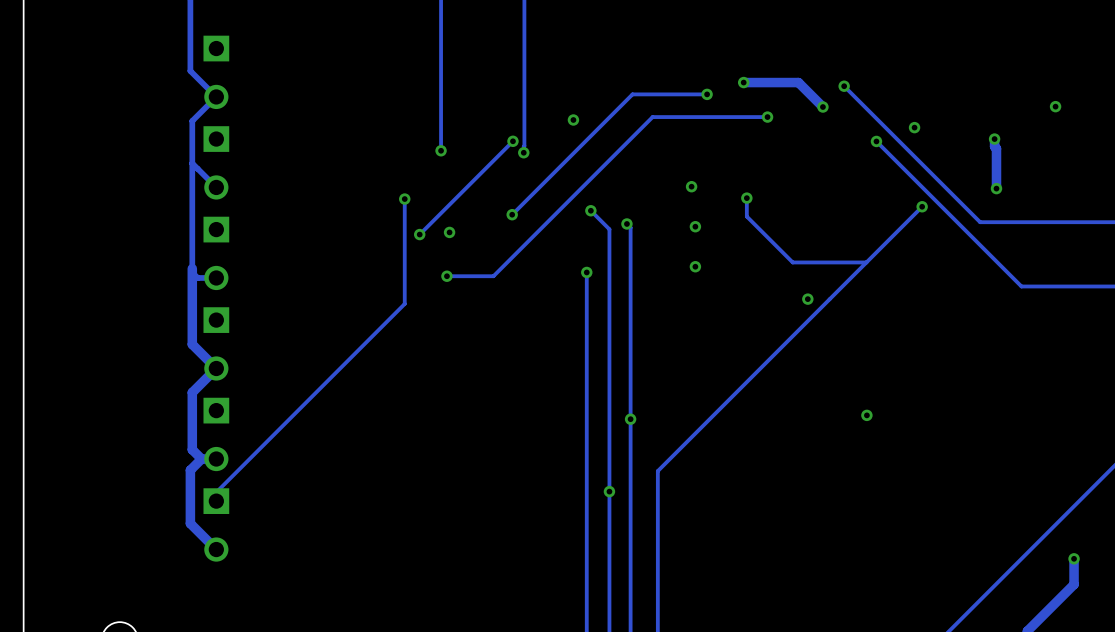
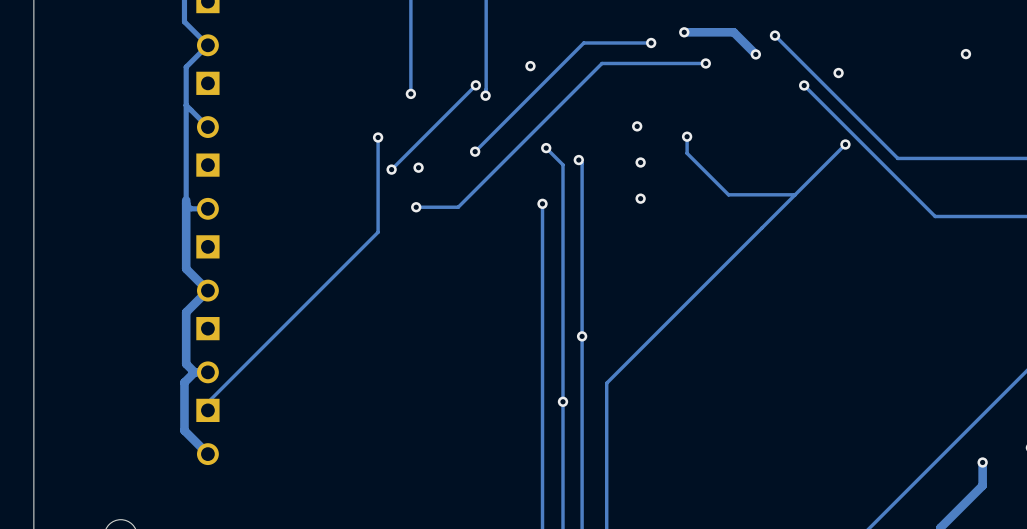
track: (994, 139) (996, 148) (996, 188) -> none
via: (994, 139) -> none
via: (996, 188) -> none
via: (807, 299) -> none
via: (866, 415) -> none

